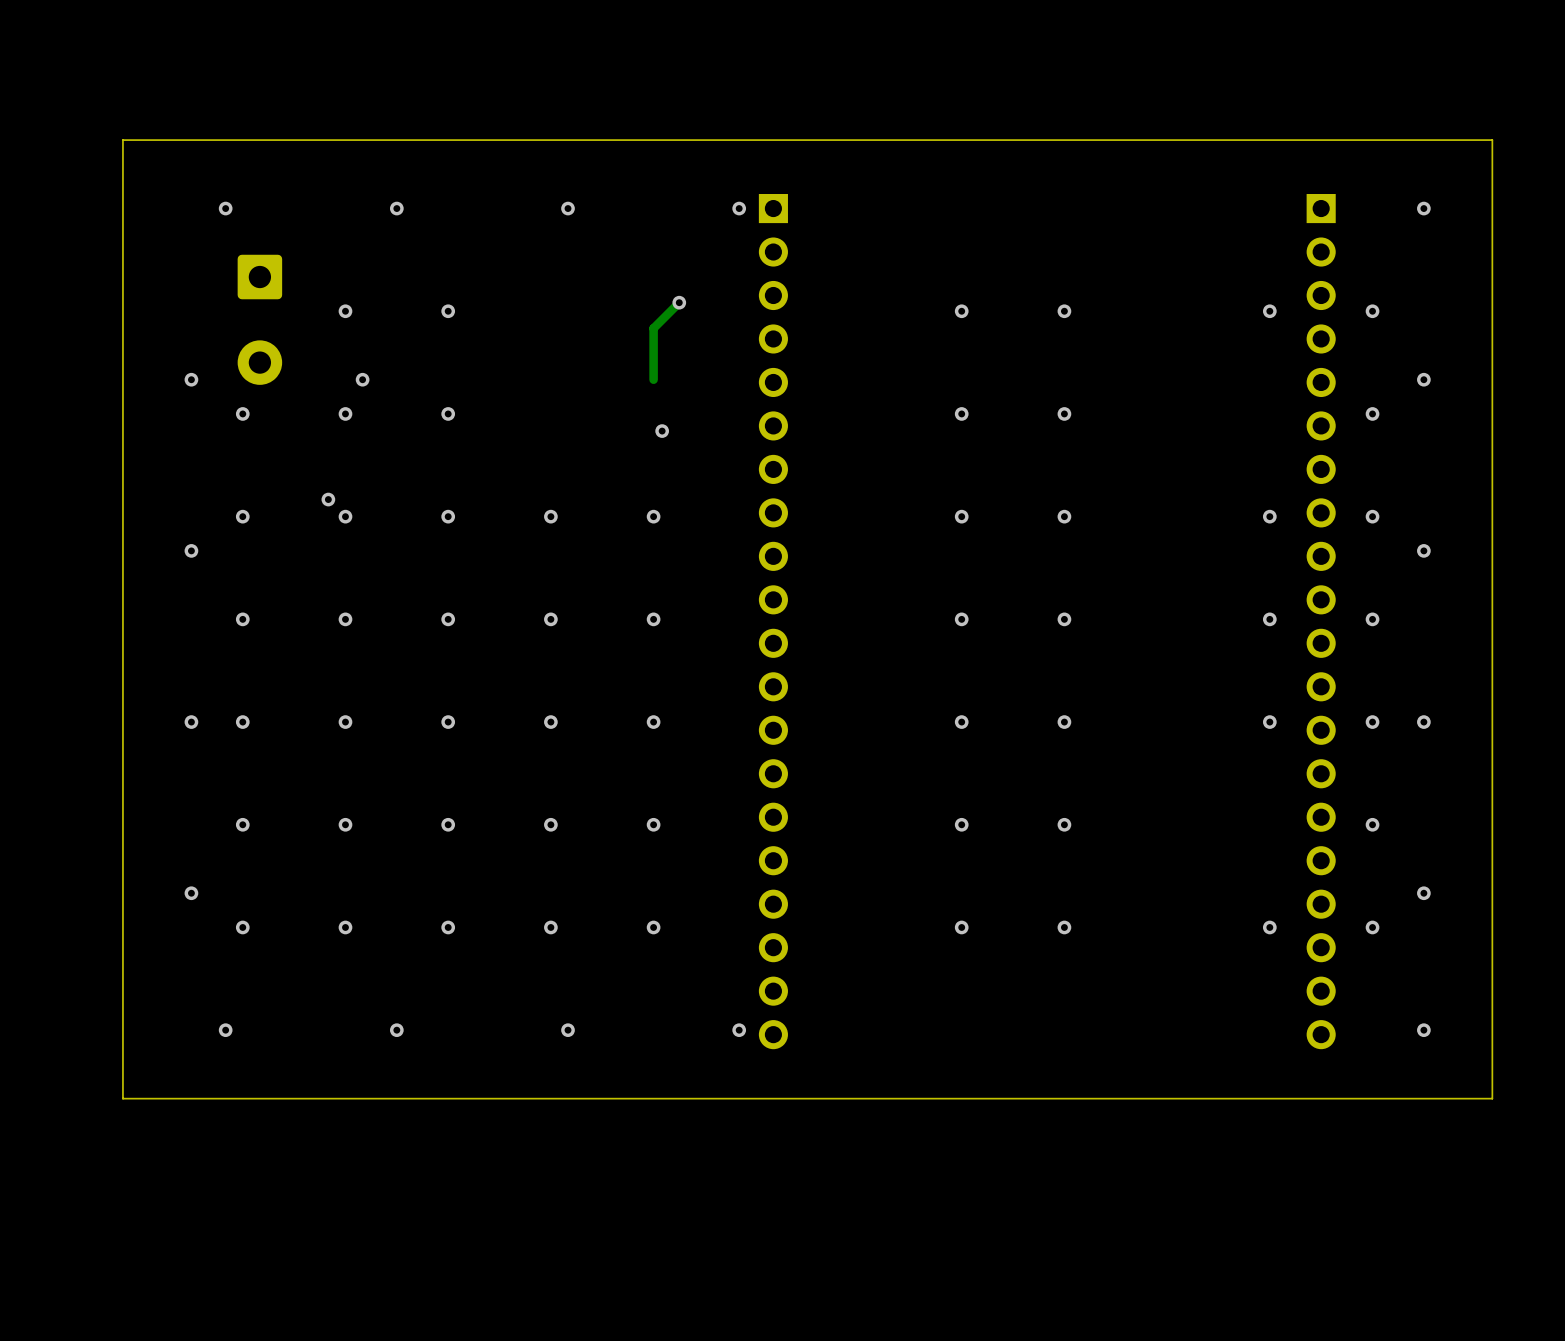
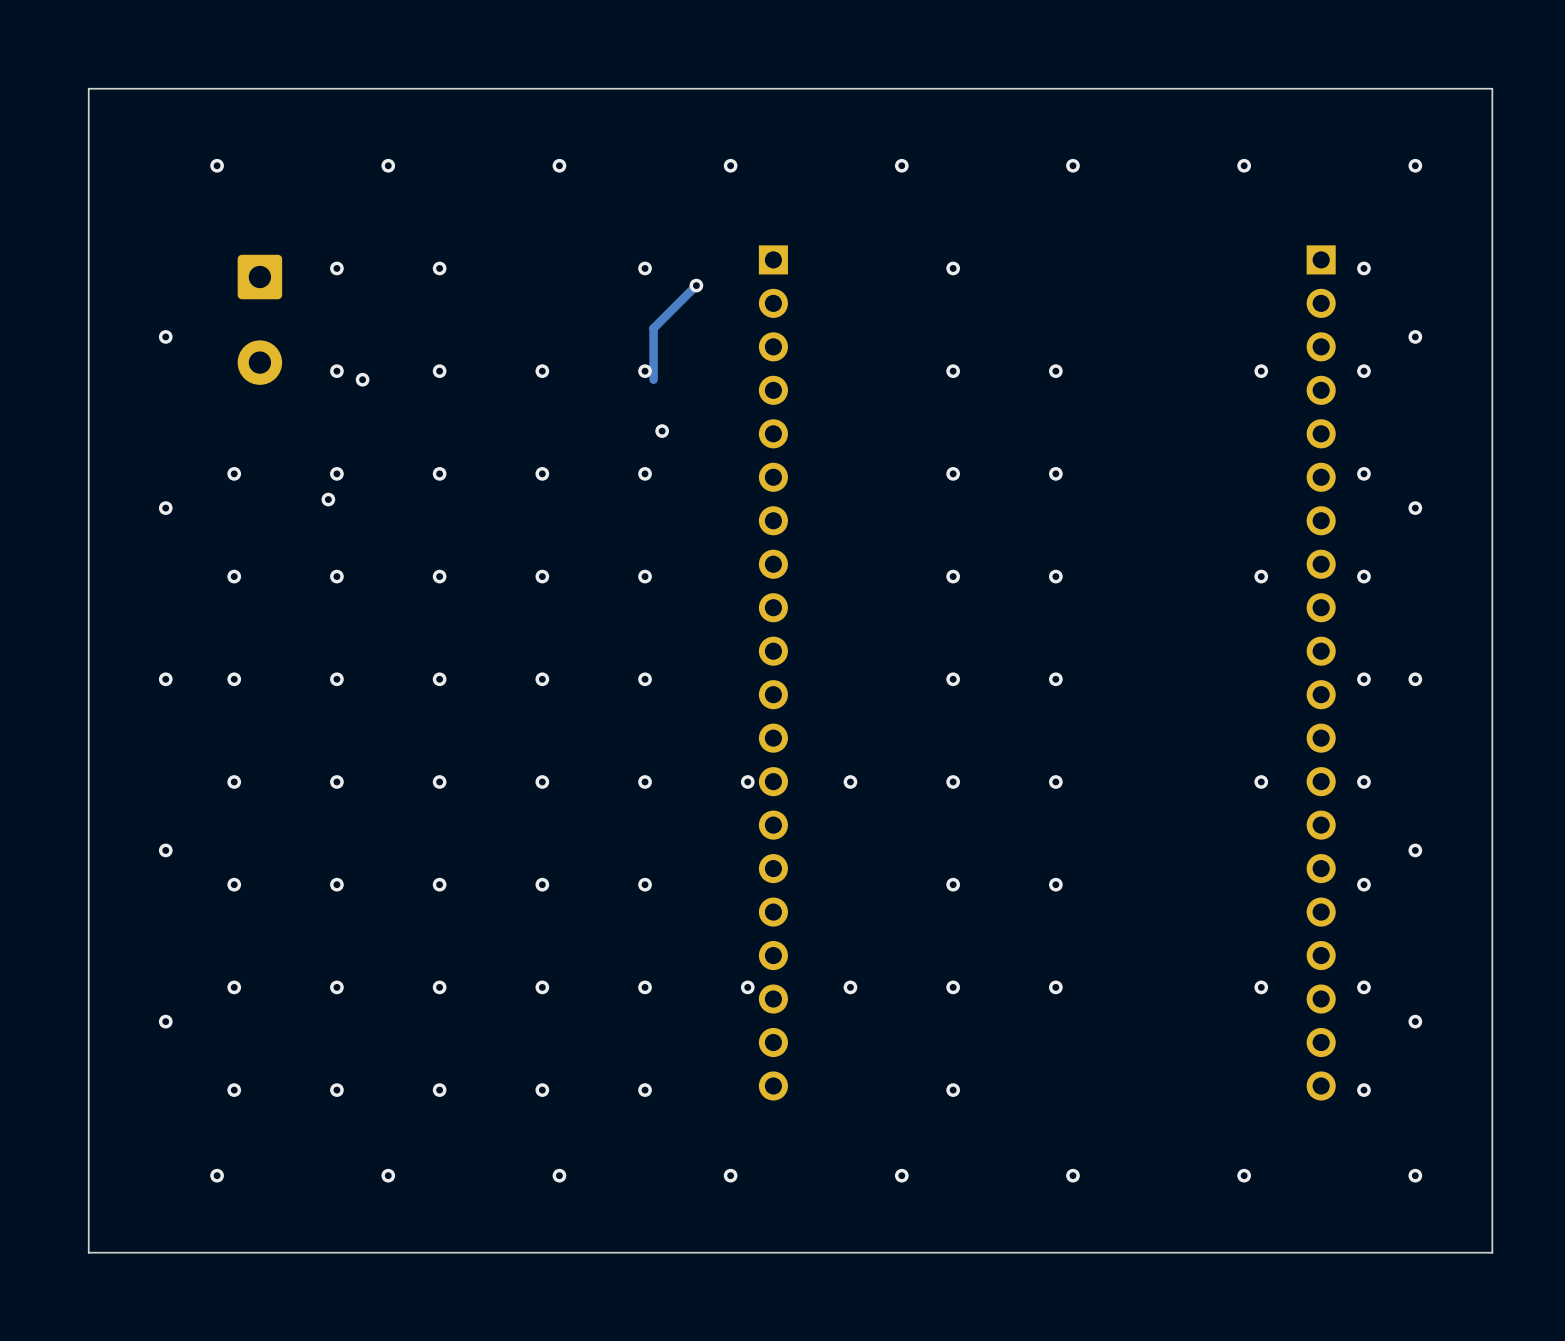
board edge: (1492, 140) (122, 140) (122, 1098) (1492, 1098) -> (1492, 140) (1492, 88) (88, 88) (88, 1252) (1492, 1252) (1492, 1098)
via: none -> (388, 165)
via: none -> (901, 165)
via: none -> (1072, 165)
via: none -> (1244, 165)
via: none -> (1415, 165)
via position: (225, 208) -> (217, 165)
via: (396, 208) -> none
via position: (568, 208) -> (559, 165)
via position: (739, 208) -> (730, 165)
via: (1423, 208) -> none
via: none -> (336, 268)
via: none -> (439, 268)
via: none -> (645, 268)
via: none -> (953, 268)
via: none -> (1363, 268)
track: none -> (696, 285) (679, 302)
via: none -> (696, 285)
via: (679, 302) -> none
via: (345, 311) -> none
via: (448, 311) -> none
via: (961, 311) -> none
via: (1064, 311) -> none
via: (1269, 311) -> none
via: (1372, 311) -> none
via: none -> (1415, 336)
via: none -> (336, 371)
via: none -> (439, 371)
via: none -> (542, 371)
via: none -> (645, 371)
via: none -> (953, 371)
via: none -> (1055, 371)
via: none -> (1261, 371)
via: none -> (1363, 371)
via position: (191, 379) -> (165, 336)
via: (1423, 379) -> none
via: (242, 413) -> none
via: (345, 413) -> none
via: (448, 413) -> none
via: (961, 413) -> none
via: (1064, 413) -> none
via: (1372, 413) -> none
via: none -> (234, 473)
via: none -> (336, 473)
via: none -> (439, 473)
via: none -> (542, 473)
via: none -> (645, 473)
via: none -> (953, 473)
via: none -> (1055, 473)
via: none -> (1363, 473)
via: none -> (165, 508)
via: none -> (1415, 508)
via: (242, 516) -> none
via: (345, 516) -> none
via: (448, 516) -> none
via: (550, 516) -> none
via: (653, 516) -> none
via: (961, 516) -> none
via: (1064, 516) -> none
via: (1269, 516) -> none
via: (1372, 516) -> none
via: (191, 550) -> none
via: (1423, 550) -> none
via: none -> (234, 576)
via: none -> (336, 576)
via: none -> (439, 576)
via: none -> (542, 576)
via: none -> (645, 576)
via: none -> (953, 576)
via: none -> (1055, 576)
via: none -> (1261, 576)
via: none -> (1363, 576)
via: (242, 619) -> none
via: (345, 619) -> none
via: (448, 619) -> none
via: (550, 619) -> none
via: (653, 619) -> none
via: (961, 619) -> none
via: (1064, 619) -> none
via: (1269, 619) -> none
via: (1372, 619) -> none
part position: (773, 621) -> (773, 672)
part position: (1321, 621) -> (1321, 672)
via: none -> (165, 679)
via: none -> (234, 679)
via: none -> (336, 679)
via: none -> (439, 679)
via: none -> (542, 679)
via: none -> (645, 679)
via: none -> (953, 679)
via: none -> (1055, 679)
via: none -> (1363, 679)
via: none -> (1415, 679)
via: (191, 722) -> none
via: (242, 722) -> none
via: (345, 722) -> none
via: (448, 722) -> none
via: (550, 722) -> none
via: (653, 722) -> none
via: (961, 722) -> none
via: (1064, 722) -> none
via: (1269, 722) -> none
via: (1372, 722) -> none
via: (1423, 722) -> none
via: none -> (234, 781)
via: none -> (336, 781)
via: none -> (439, 781)
via: none -> (542, 781)
via: none -> (645, 781)
via: none -> (747, 781)
via: none -> (850, 781)
via: none -> (953, 781)
via: none -> (1055, 781)
via: none -> (1261, 781)
via: none -> (1363, 781)
via: (242, 824) -> none
via: (345, 824) -> none
via: (448, 824) -> none
via: (550, 824) -> none
via: (653, 824) -> none
via: (961, 824) -> none
via: (1064, 824) -> none
via: (1372, 824) -> none
via: none -> (165, 850)
via: none -> (1415, 850)
via: none -> (234, 884)
via: none -> (336, 884)
via: none -> (439, 884)
via: none -> (542, 884)
via: none -> (645, 884)
via: none -> (953, 884)
via: none -> (1055, 884)
via: none -> (1363, 884)
via: (191, 893) -> none
via: (1423, 893) -> none
via: (242, 927) -> none
via: (345, 927) -> none
via: (448, 927) -> none
via: (550, 927) -> none
via: (653, 927) -> none
via: (961, 927) -> none
via: (1064, 927) -> none
via: (1269, 927) -> none
via: (1372, 927) -> none
via: none -> (234, 987)
via: none -> (336, 987)
via: none -> (439, 987)
via: none -> (542, 987)
via: none -> (645, 987)
via: none -> (850, 987)
via: none -> (953, 987)
via: none -> (1055, 987)
via: none -> (1261, 987)
via: none -> (1363, 987)
via: none -> (165, 1021)
via: (225, 1030) -> none
via: (396, 1030) -> none
via: (568, 1030) -> none
via position: (739, 1030) -> (747, 987)
via position: (1423, 1030) -> (1415, 1021)
via: none -> (234, 1090)
via: none -> (336, 1090)
via: none -> (439, 1090)
via: none -> (542, 1090)
via: none -> (645, 1090)
via: none -> (953, 1090)
via: none -> (1363, 1090)
via: none -> (217, 1175)
via: none -> (388, 1175)
via: none -> (559, 1175)
via: none -> (730, 1175)
via: none -> (901, 1175)
via: none -> (1072, 1175)
via: none -> (1244, 1175)
via: none -> (1415, 1175)

